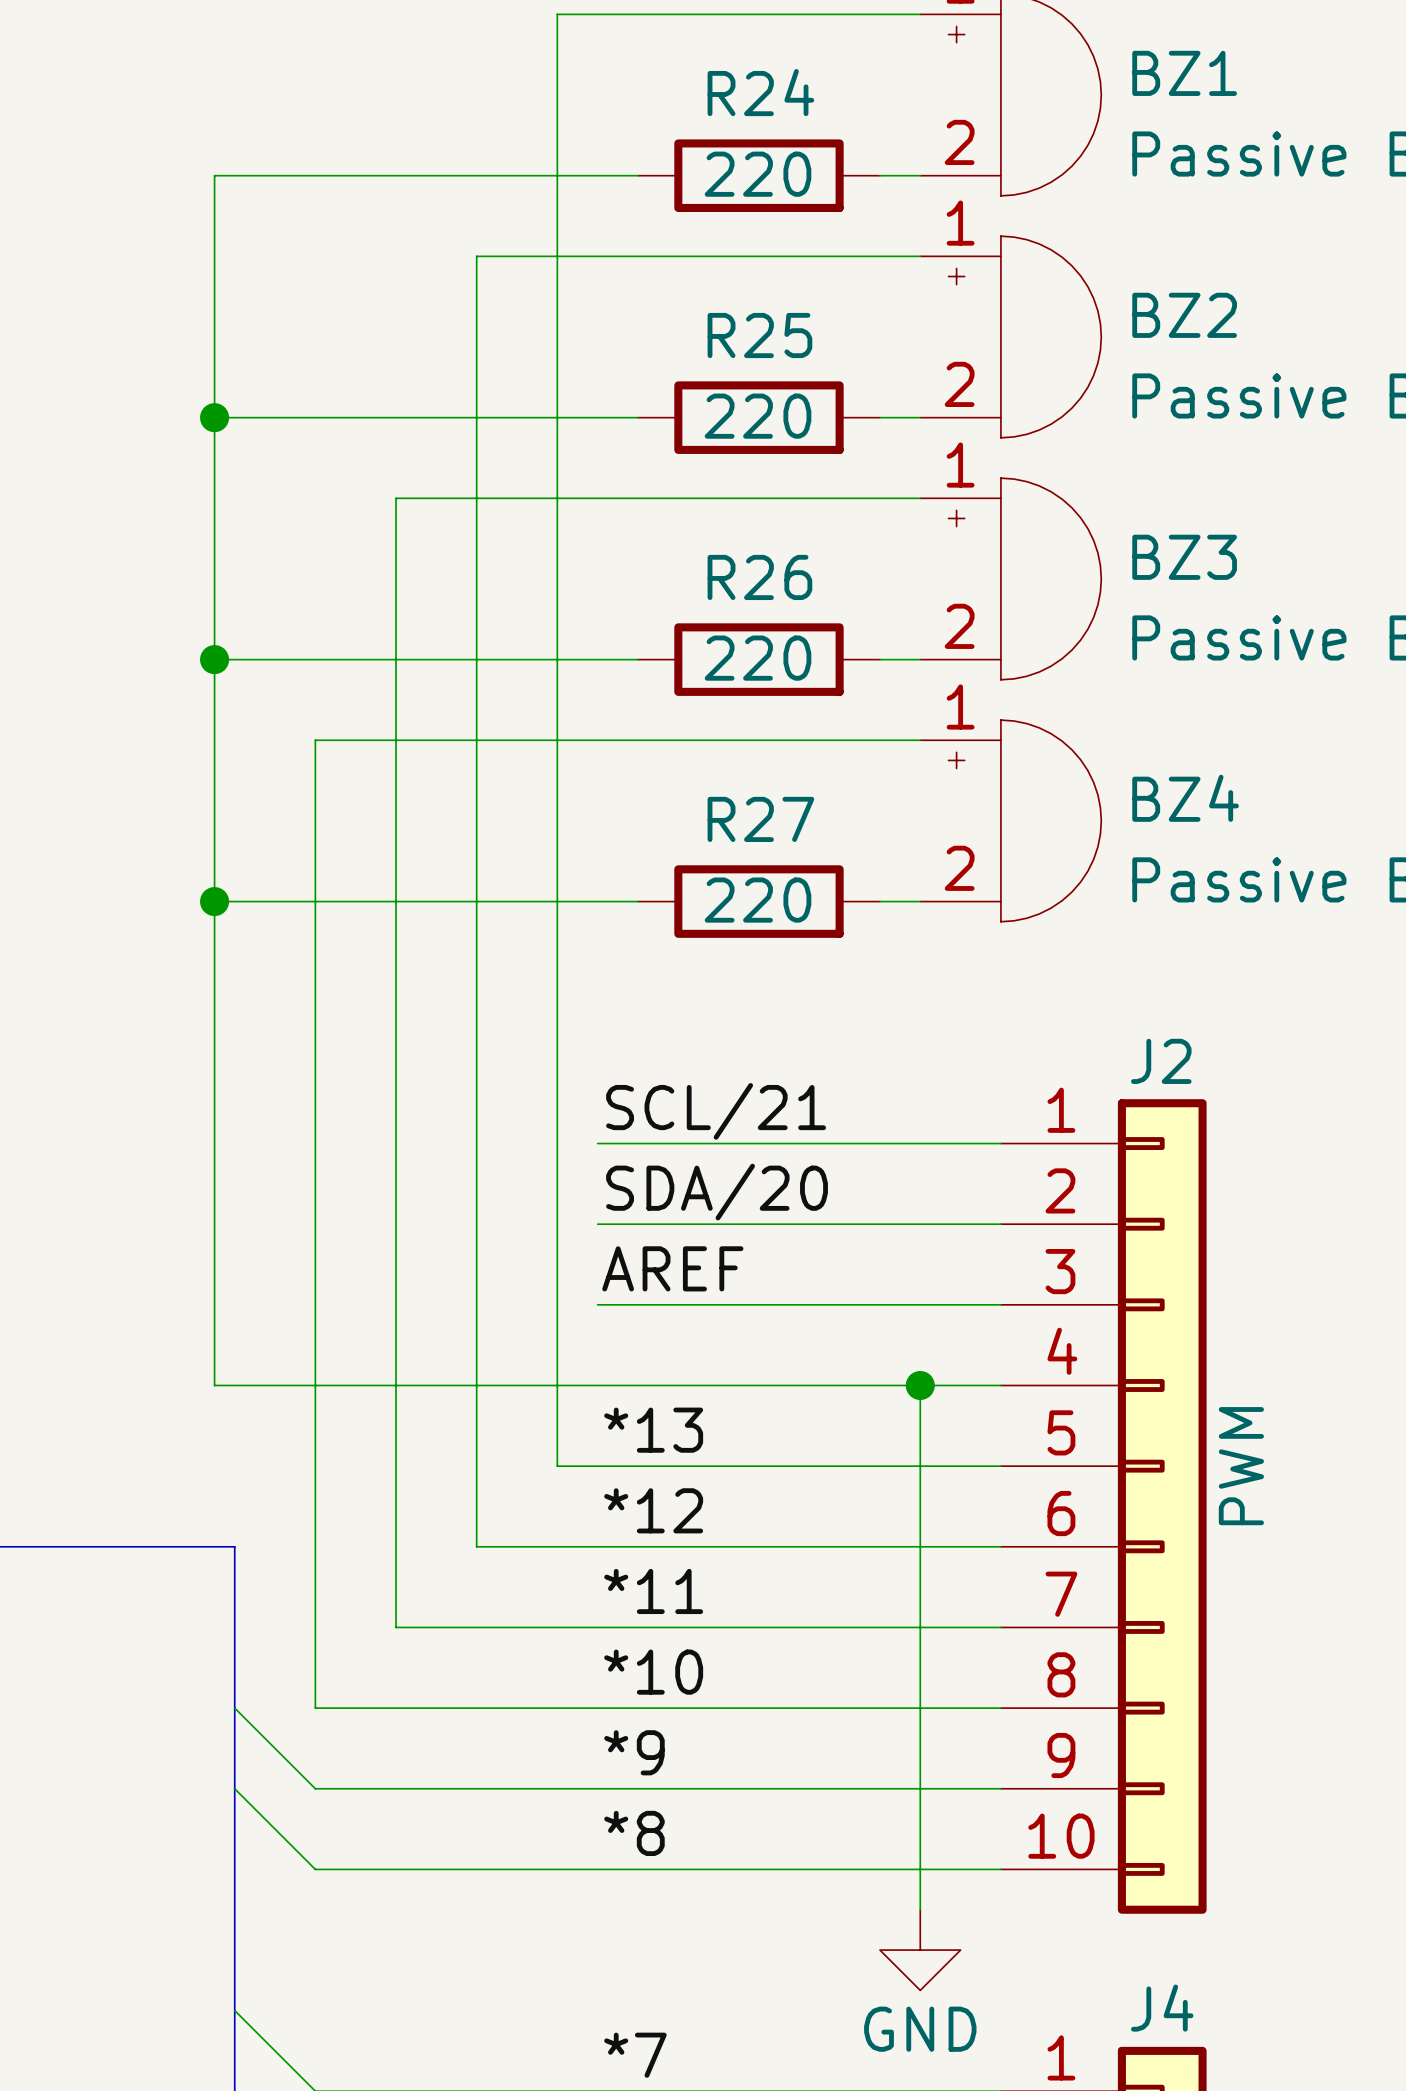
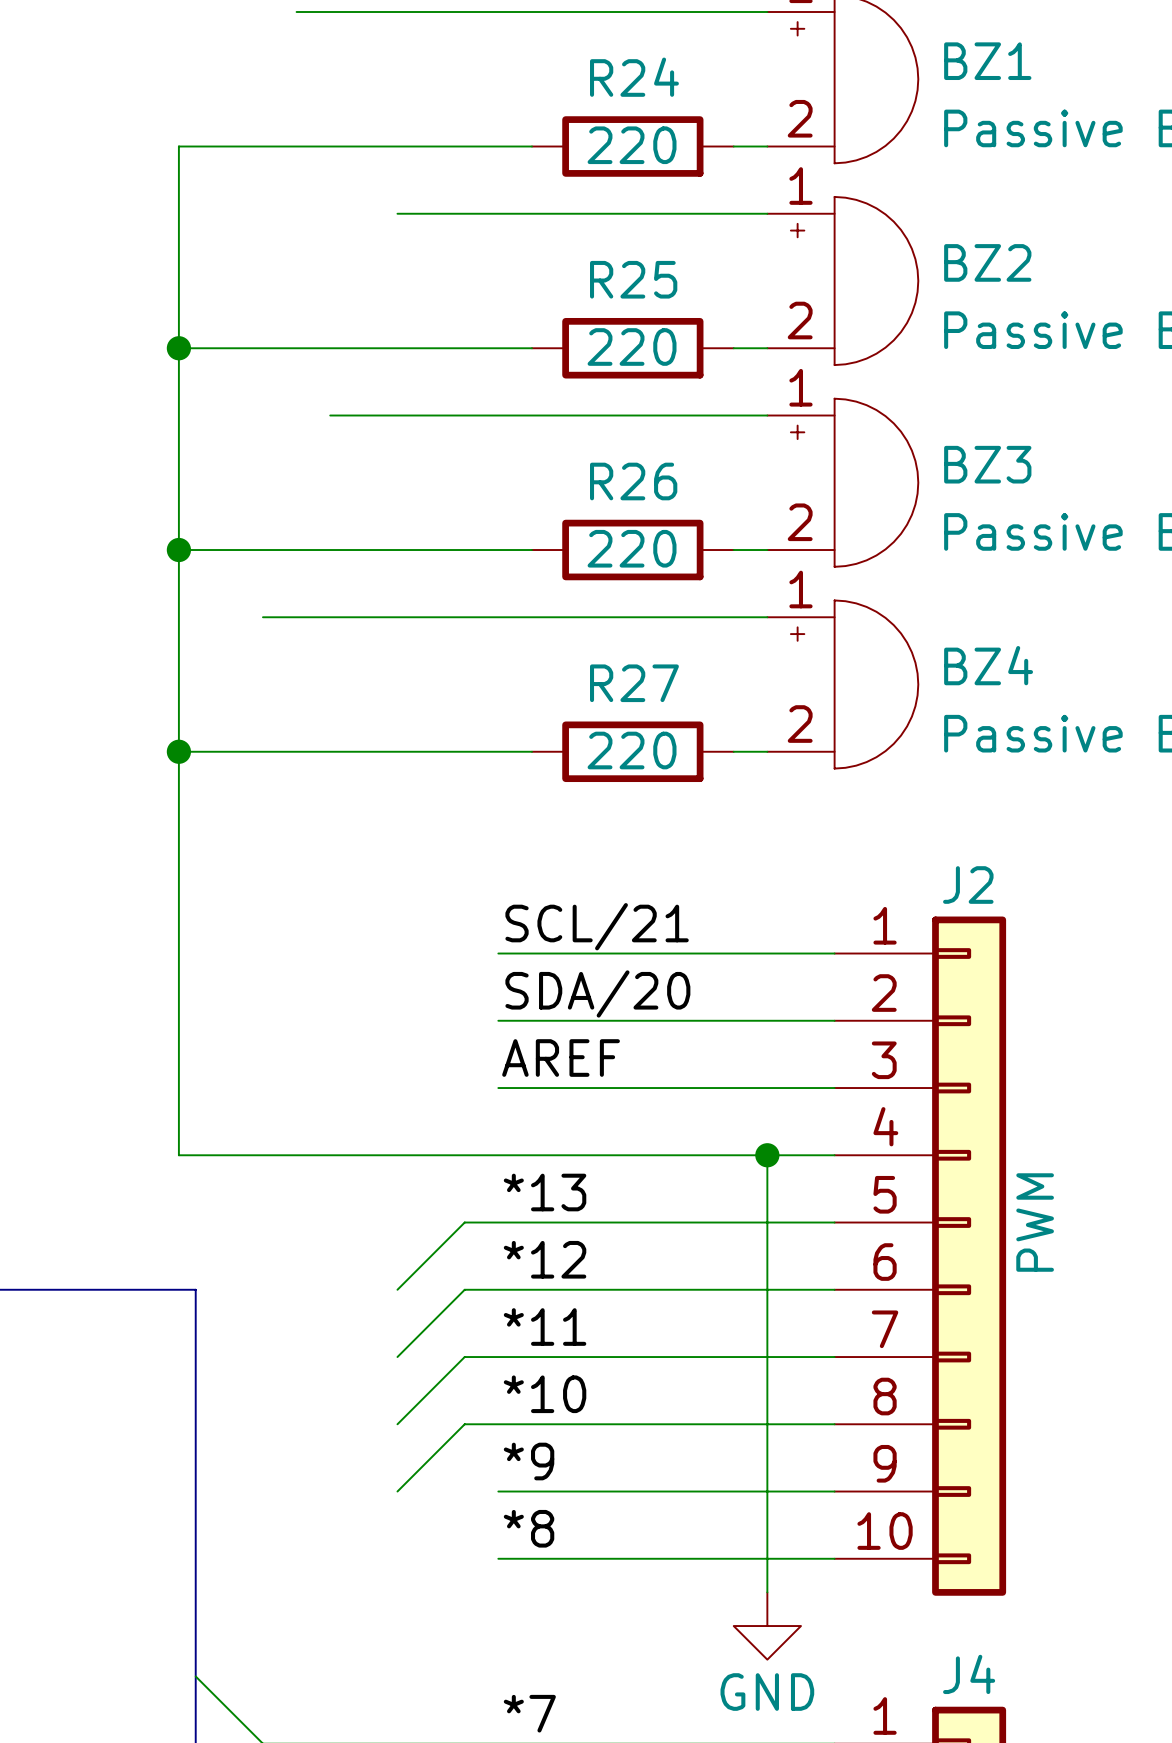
wire: (557, 14) (557, 1466) -> (464, 12) (296, 12)
wire: (476, 256) (476, 1546) (557, 1546) -> (397, 1357) (464, 1289)
wire: (396, 498) (396, 1627) (557, 1627) -> (397, 1424) (464, 1357)
wire: (315, 740) (315, 1708) (557, 1708) -> (397, 1491) (464, 1424)
wire: none -> (464, 1222) (397, 1289)
wire: (234, 1708) (315, 1788) (597, 1788) -> none
wire: (234, 1788) (315, 1869) (597, 1869) -> none

